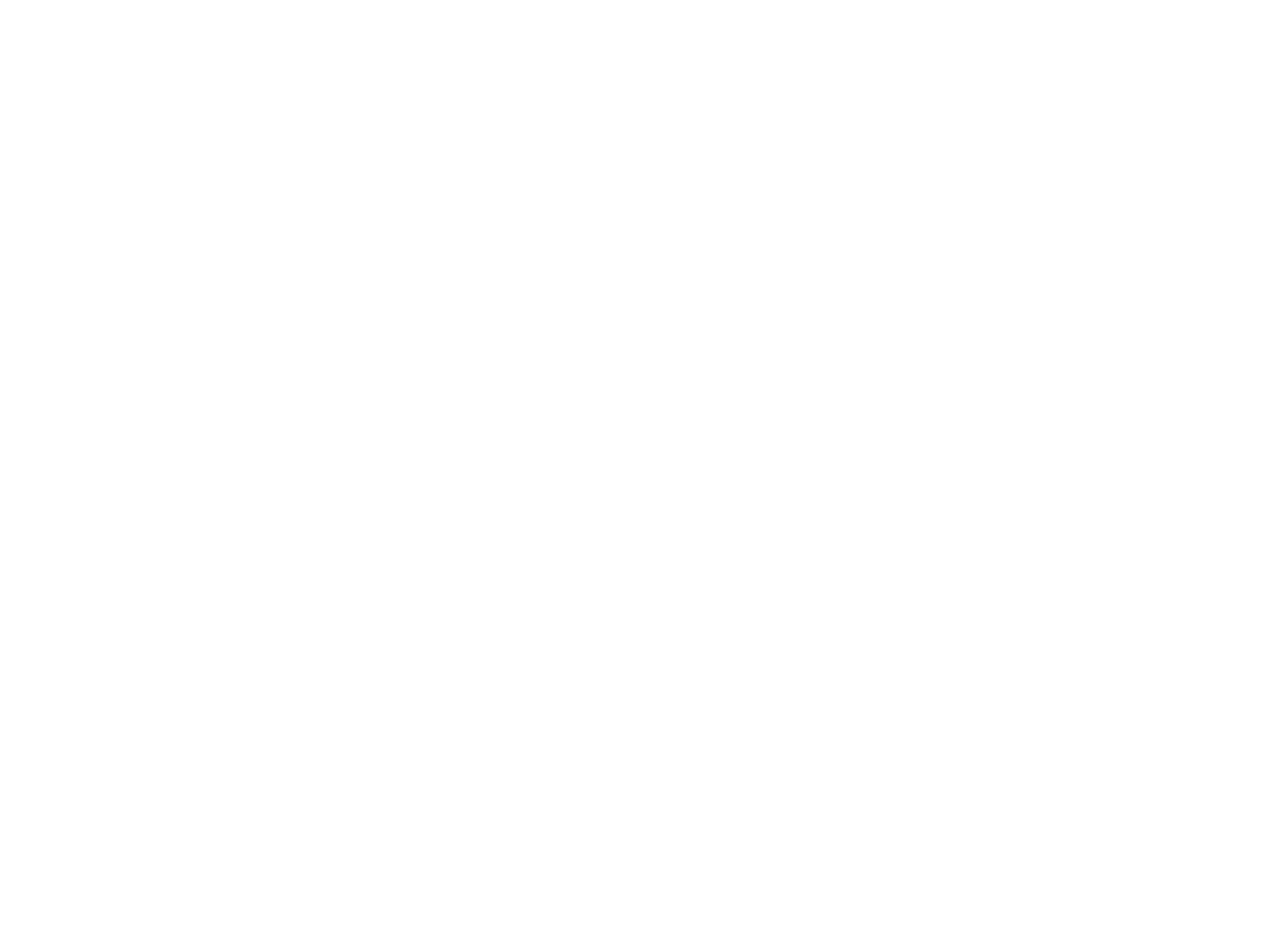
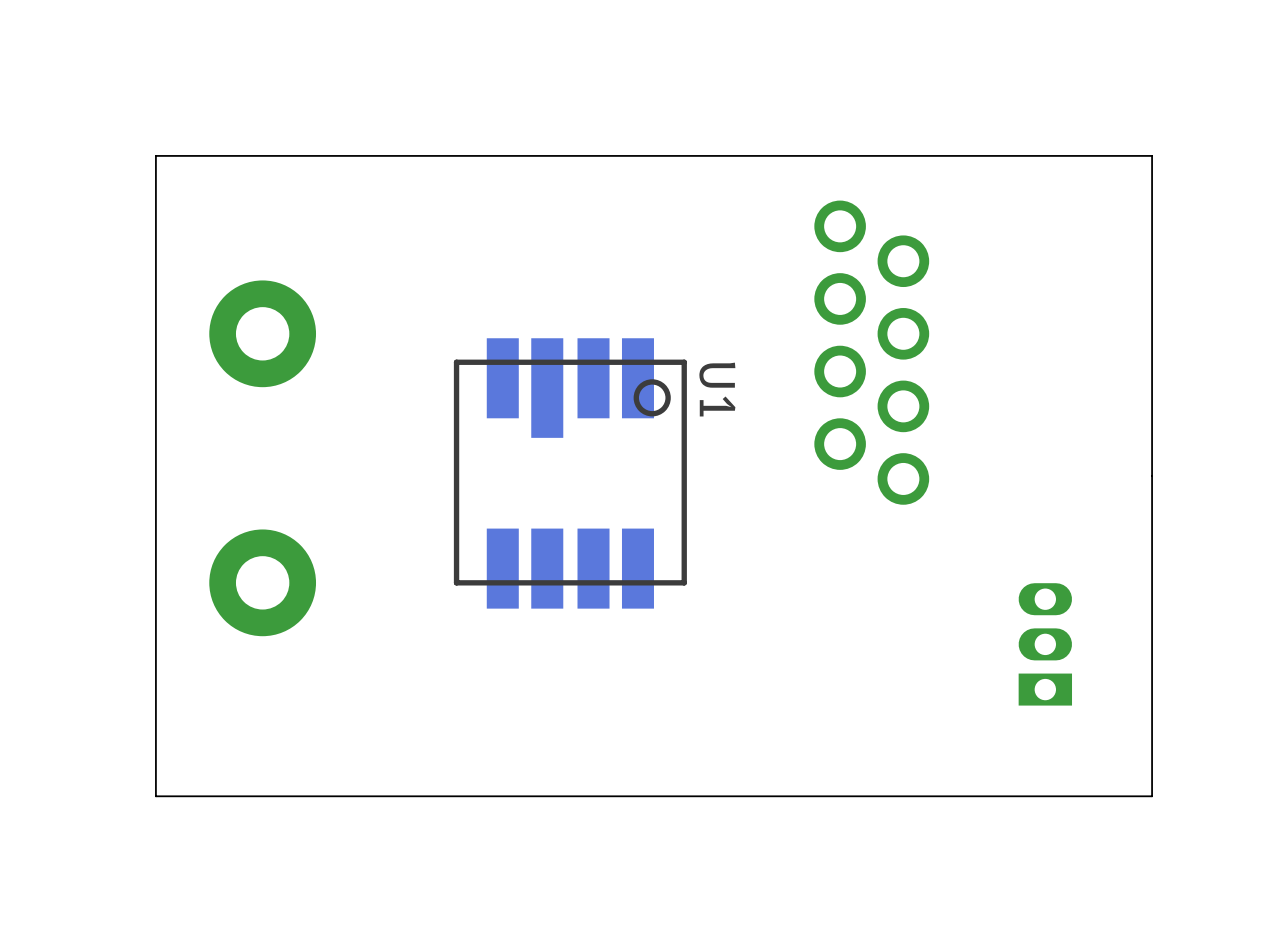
board edge: none -> (1152, 155) (1152, 796) (155, 796) (155, 155) (1152, 155)
part: none -> (262, 333)
part: none -> (871, 352)
U1: none -> (570, 473)
part: none -> (262, 582)
part: none -> (1045, 644)

